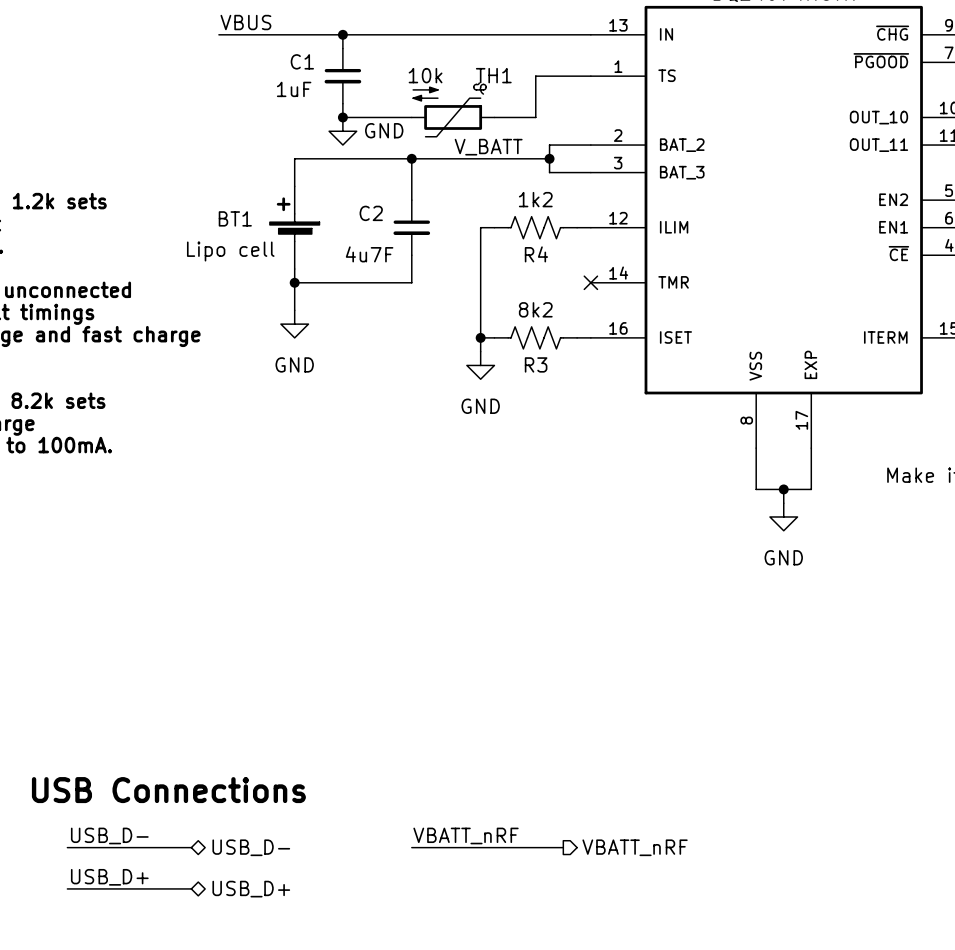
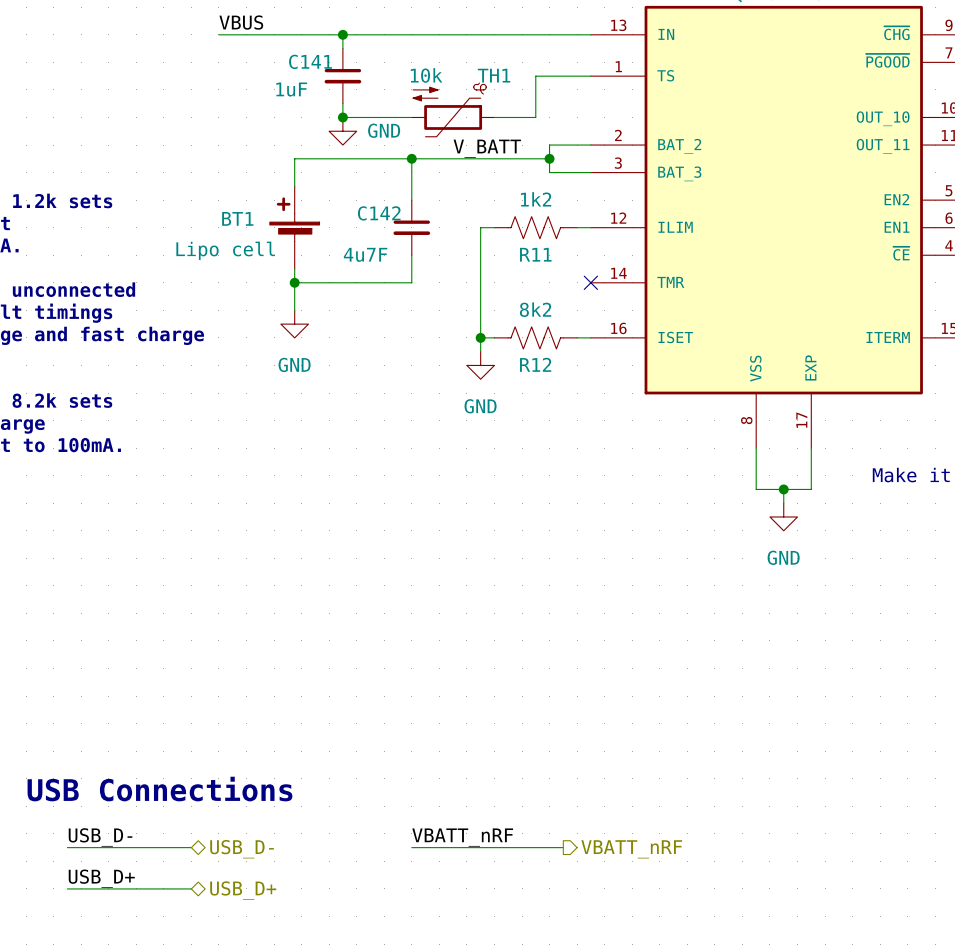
C1 name: C1 (302, 61) -> C141 (310, 61)
C2 name: C2 (371, 213) -> C142 (379, 213)
R4 name: R4 (536, 254) -> R11 (535, 254)
R3 name: R3 (536, 364) -> R12 (535, 364)

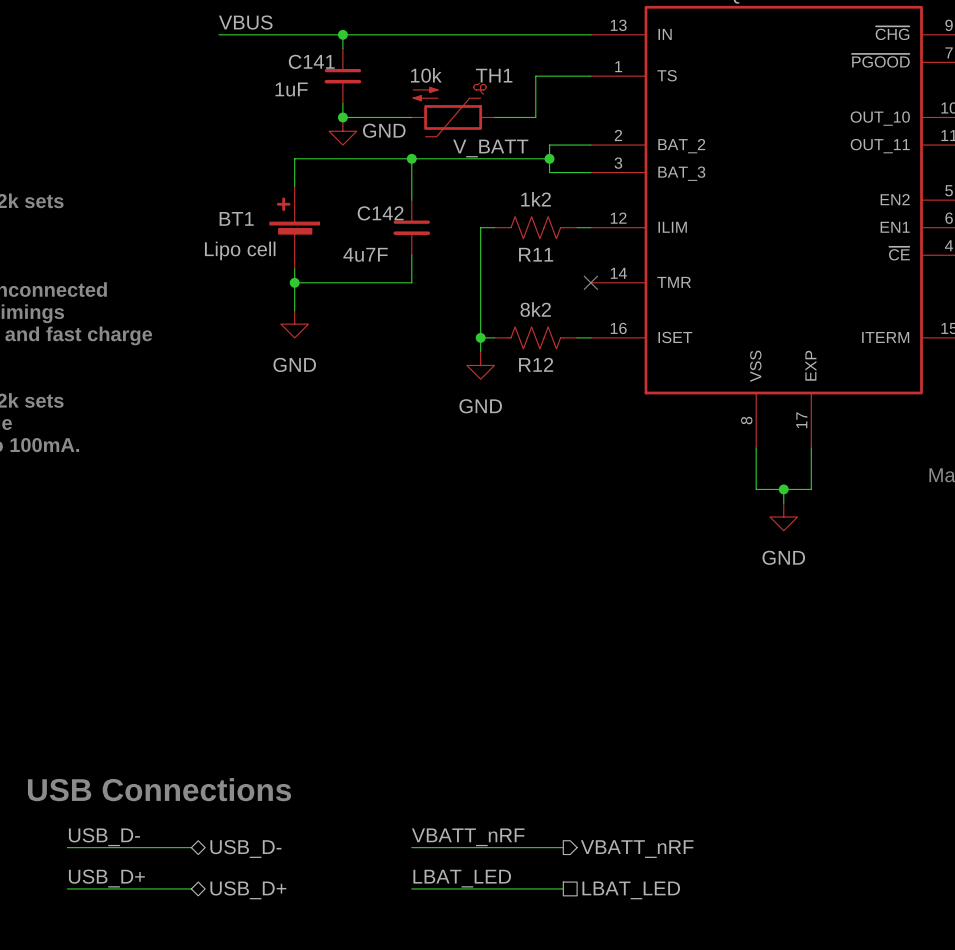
label: none -> LBAT_LED (462, 878)
wire: none -> (411, 888) (563, 888)
hierarchical label: none -> LBAT_LED (631, 890)

